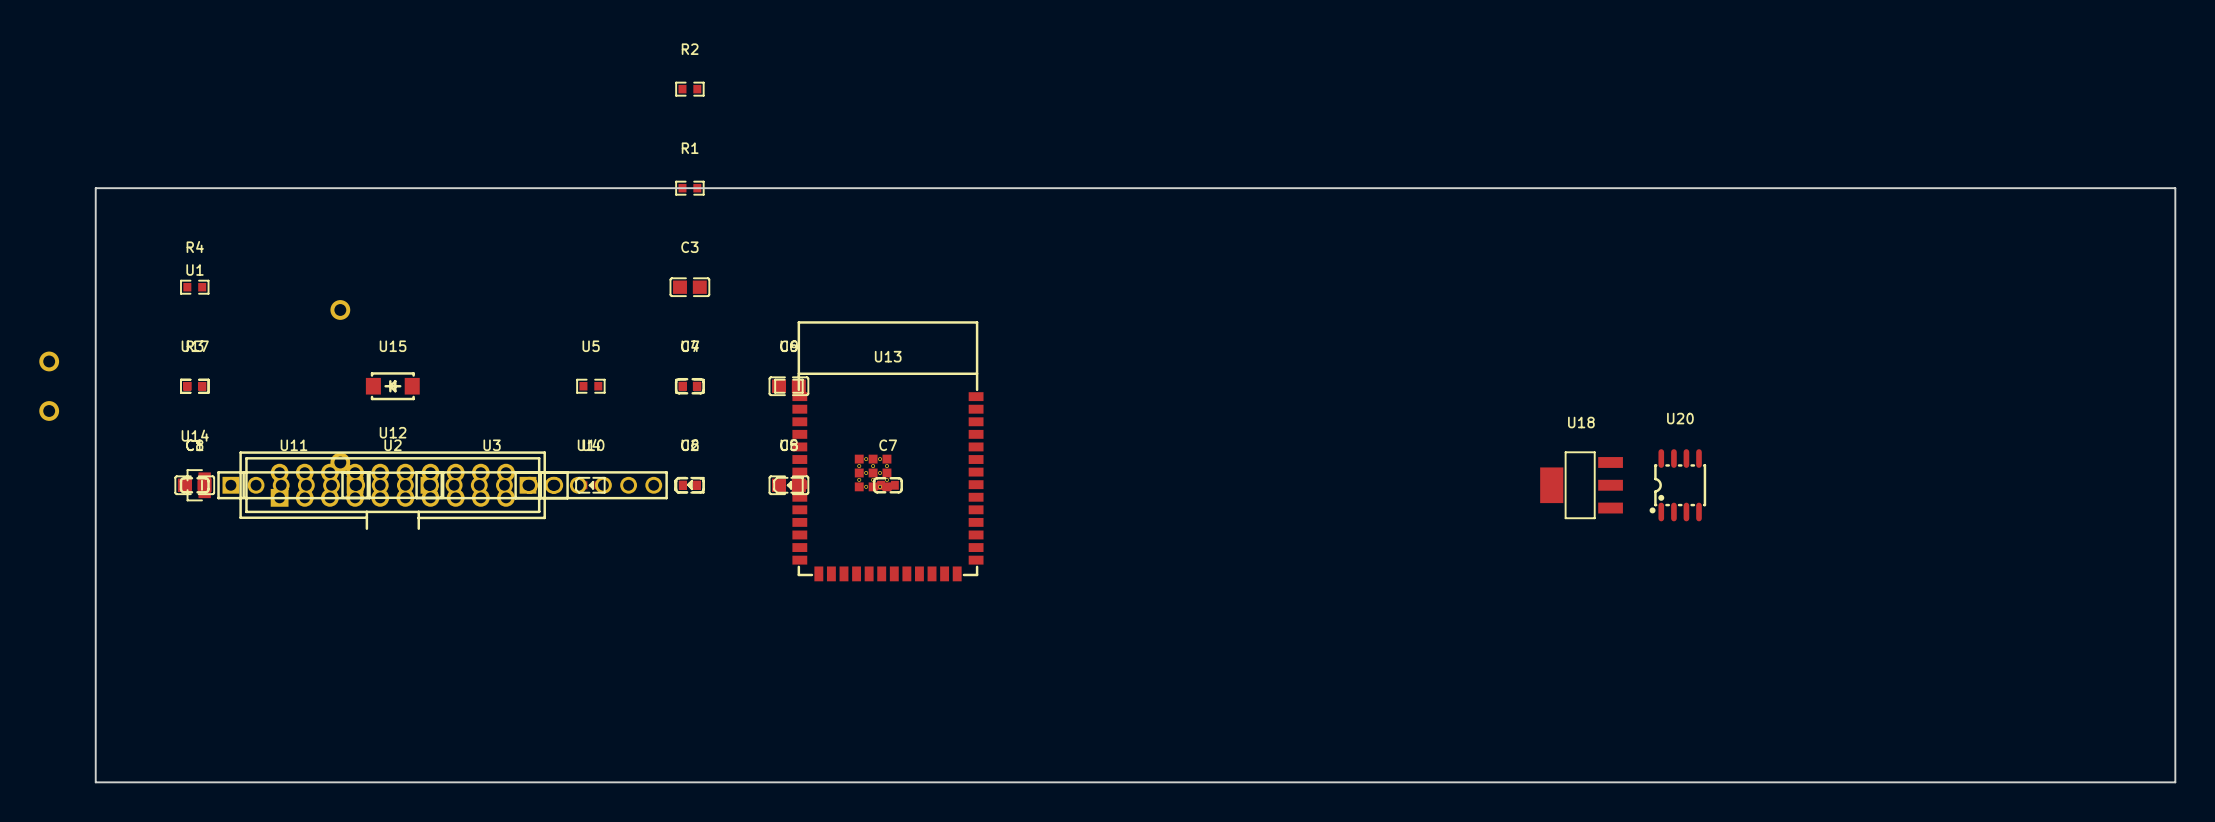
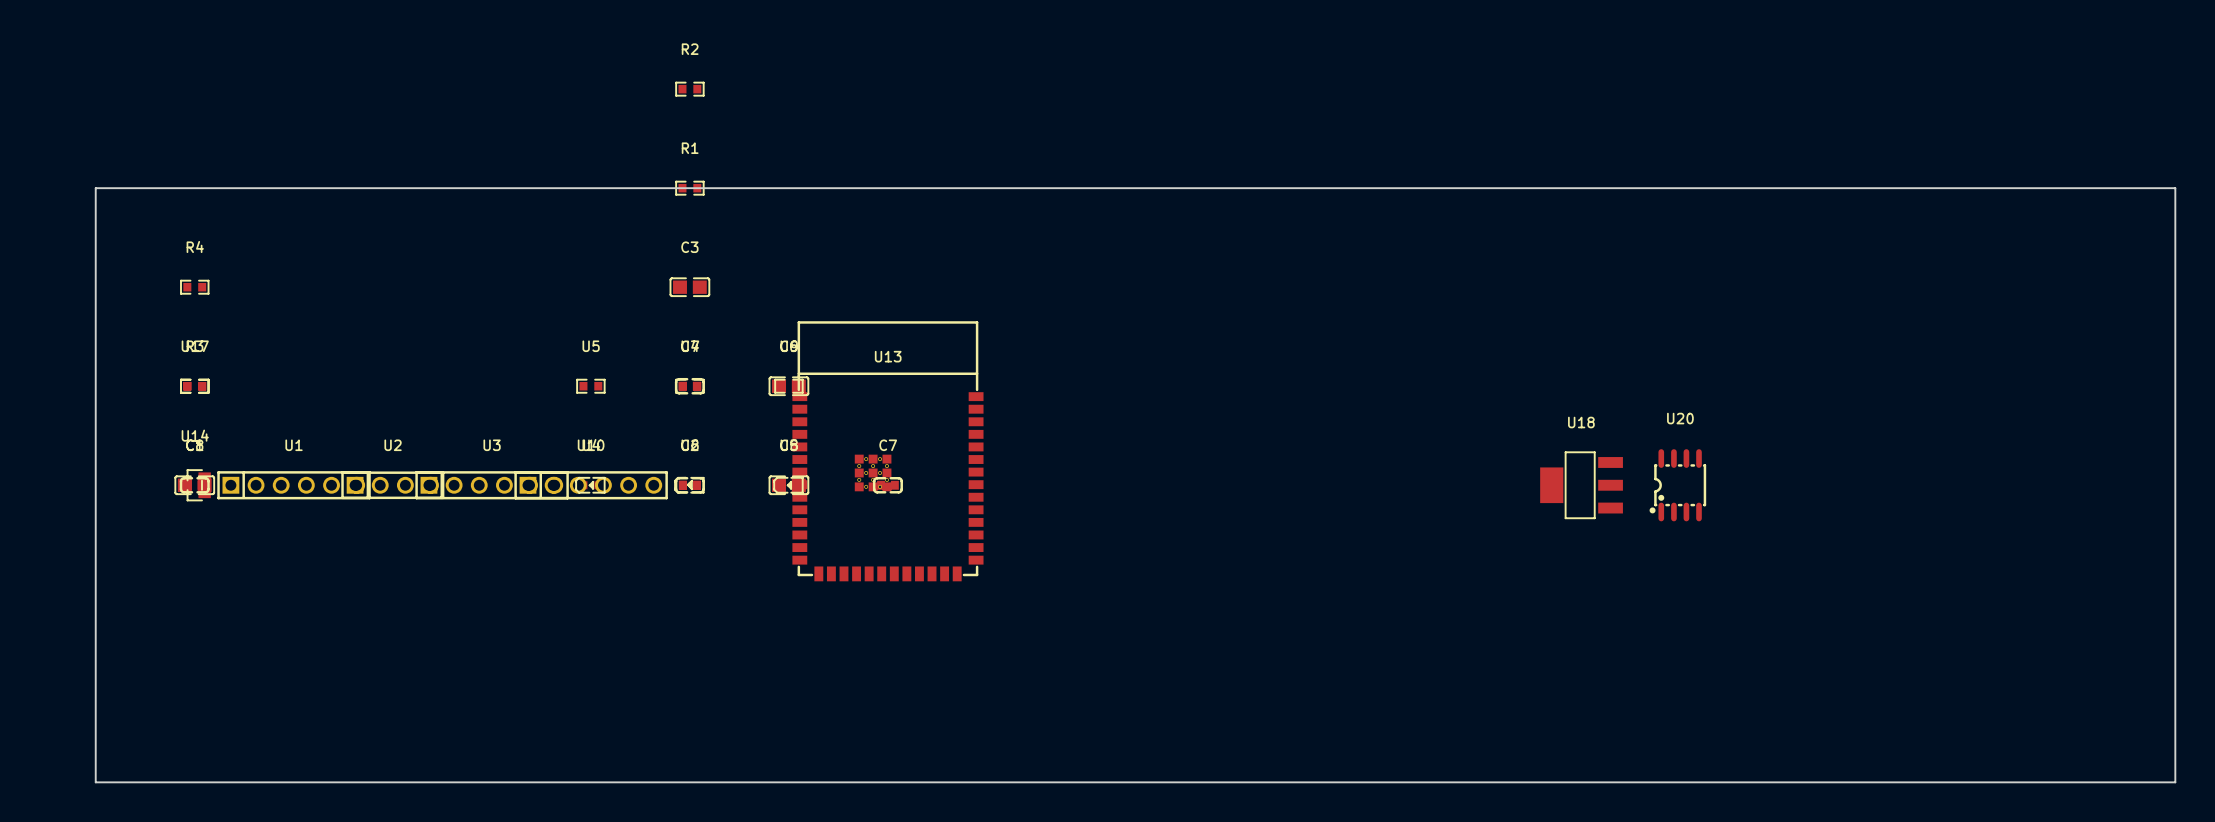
U1: (194, 386) -> none
U15: (392, 386) -> none
U11 name: U11 (294, 445) -> U1 (294, 445)
U12: (392, 490) -> none

